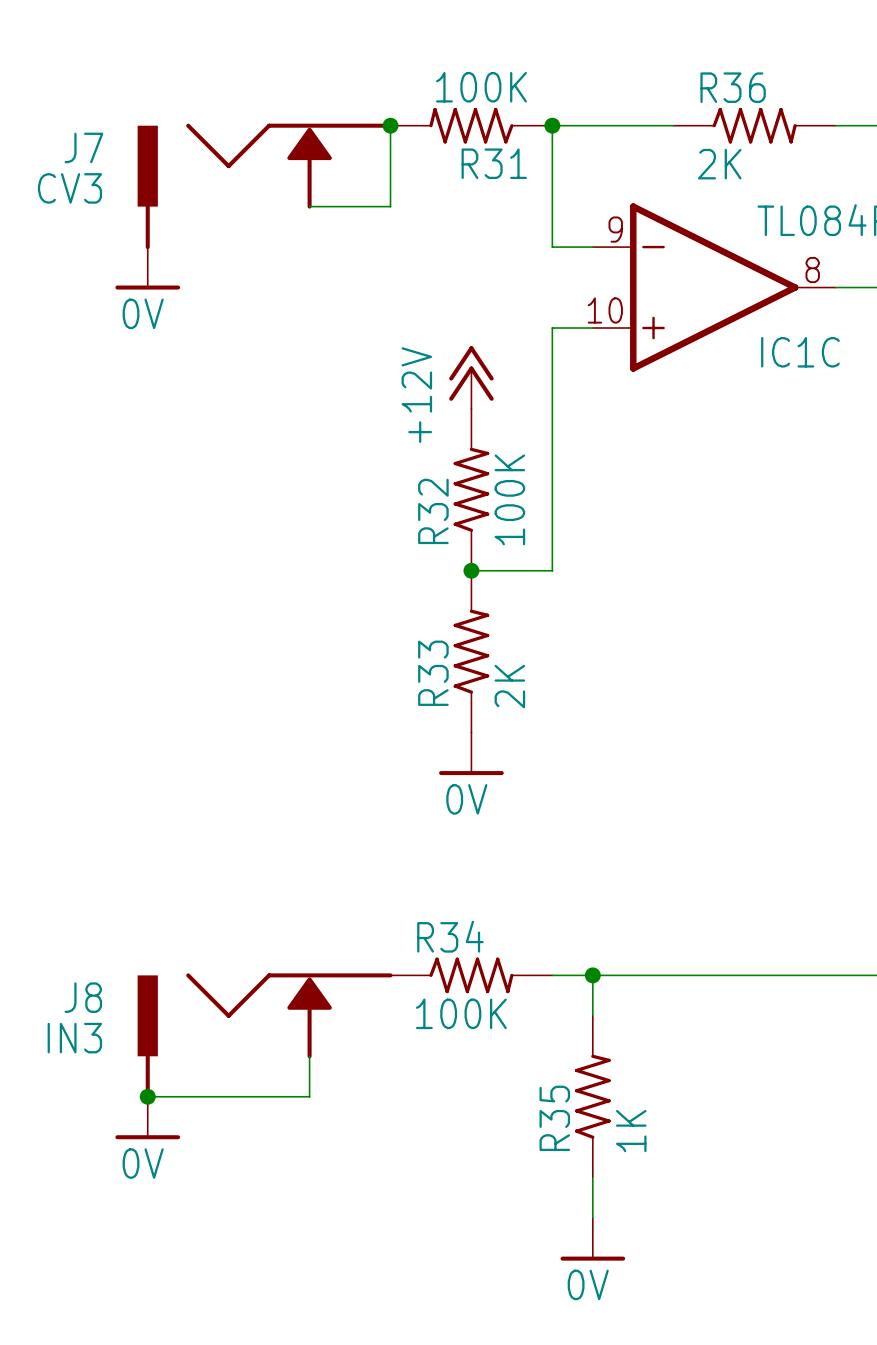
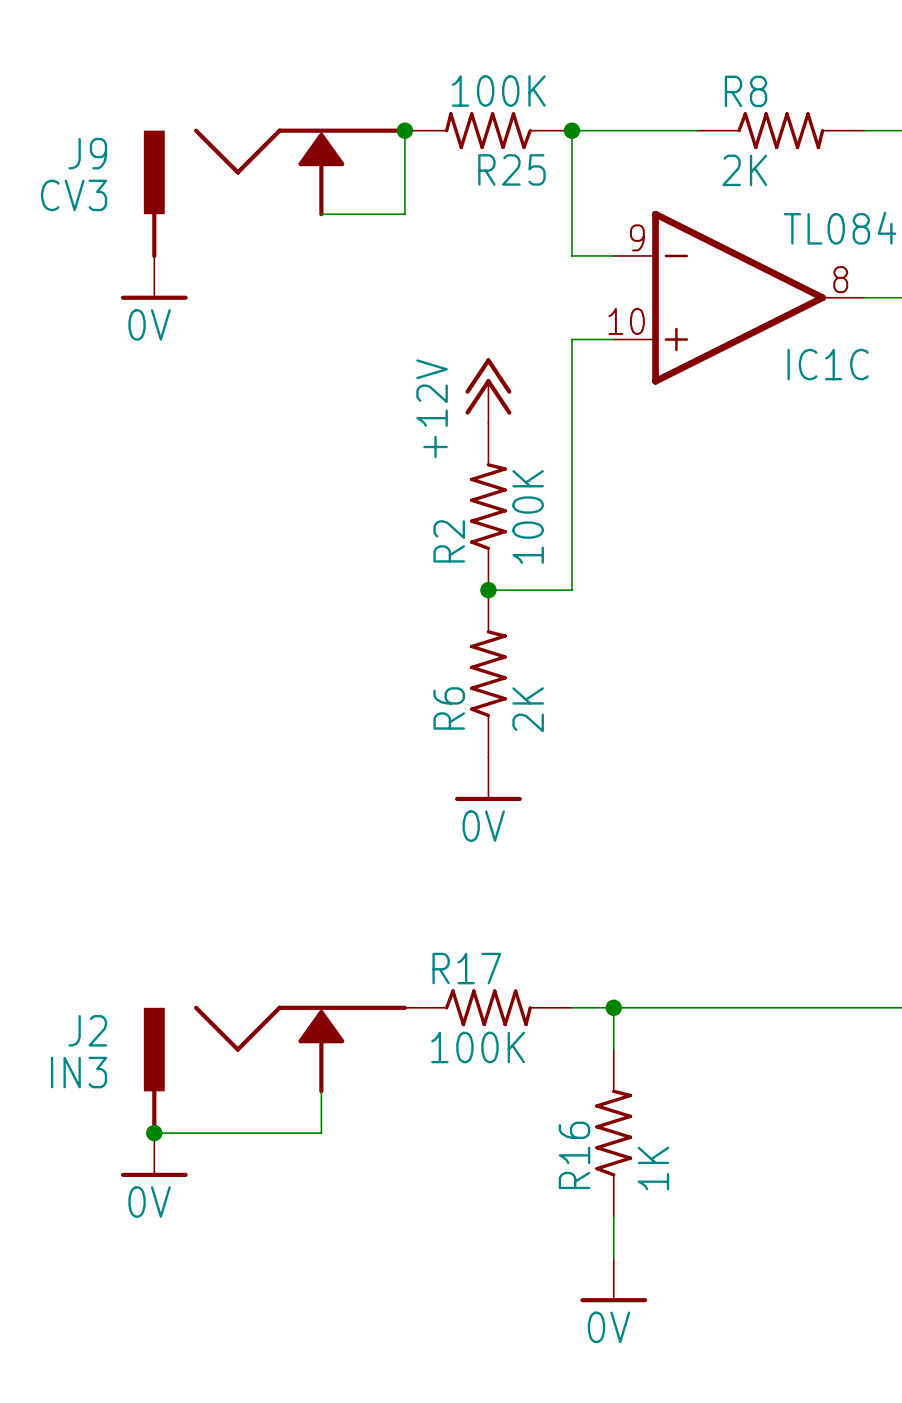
R36 name: R36 (733, 87) -> R8 (746, 91)
J7 name: J7 (83, 147) -> J9 (87, 153)
R31 name: R31 (494, 163) -> R25 (511, 169)
R32 name: R32 (433, 511) -> R2 (449, 541)
R33 name: R33 (433, 673) -> R6 (449, 708)
R34 name: R34 (450, 936) -> R17 (466, 968)
J8 name: J8 (83, 997) -> J2 (87, 1030)
R35 name: R35 (554, 1118) -> R16 (574, 1155)

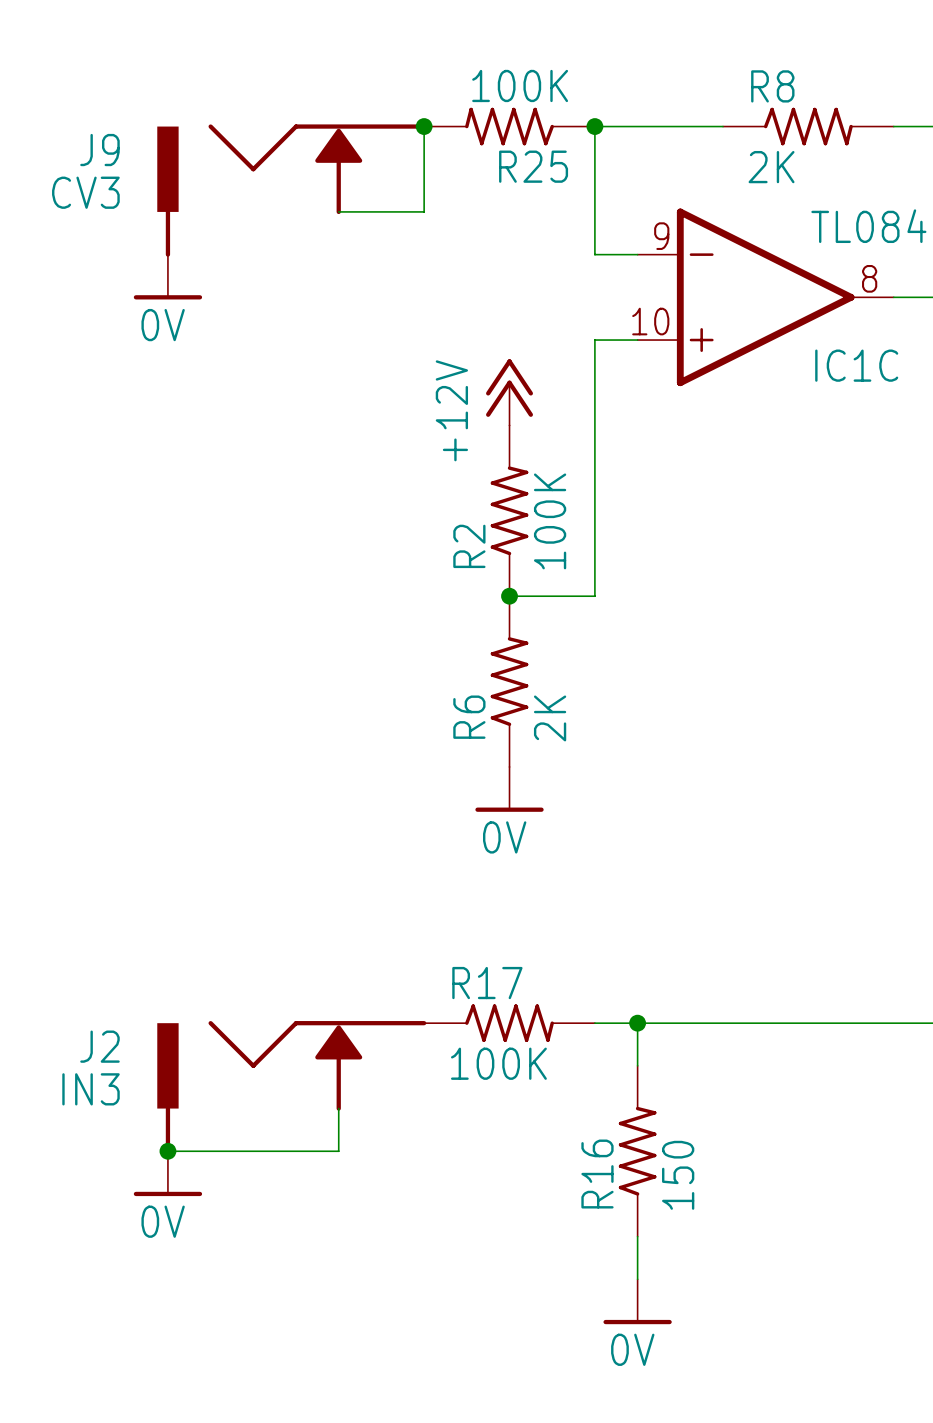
R16 value: 1K (653, 1168) -> 150 (678, 1175)

